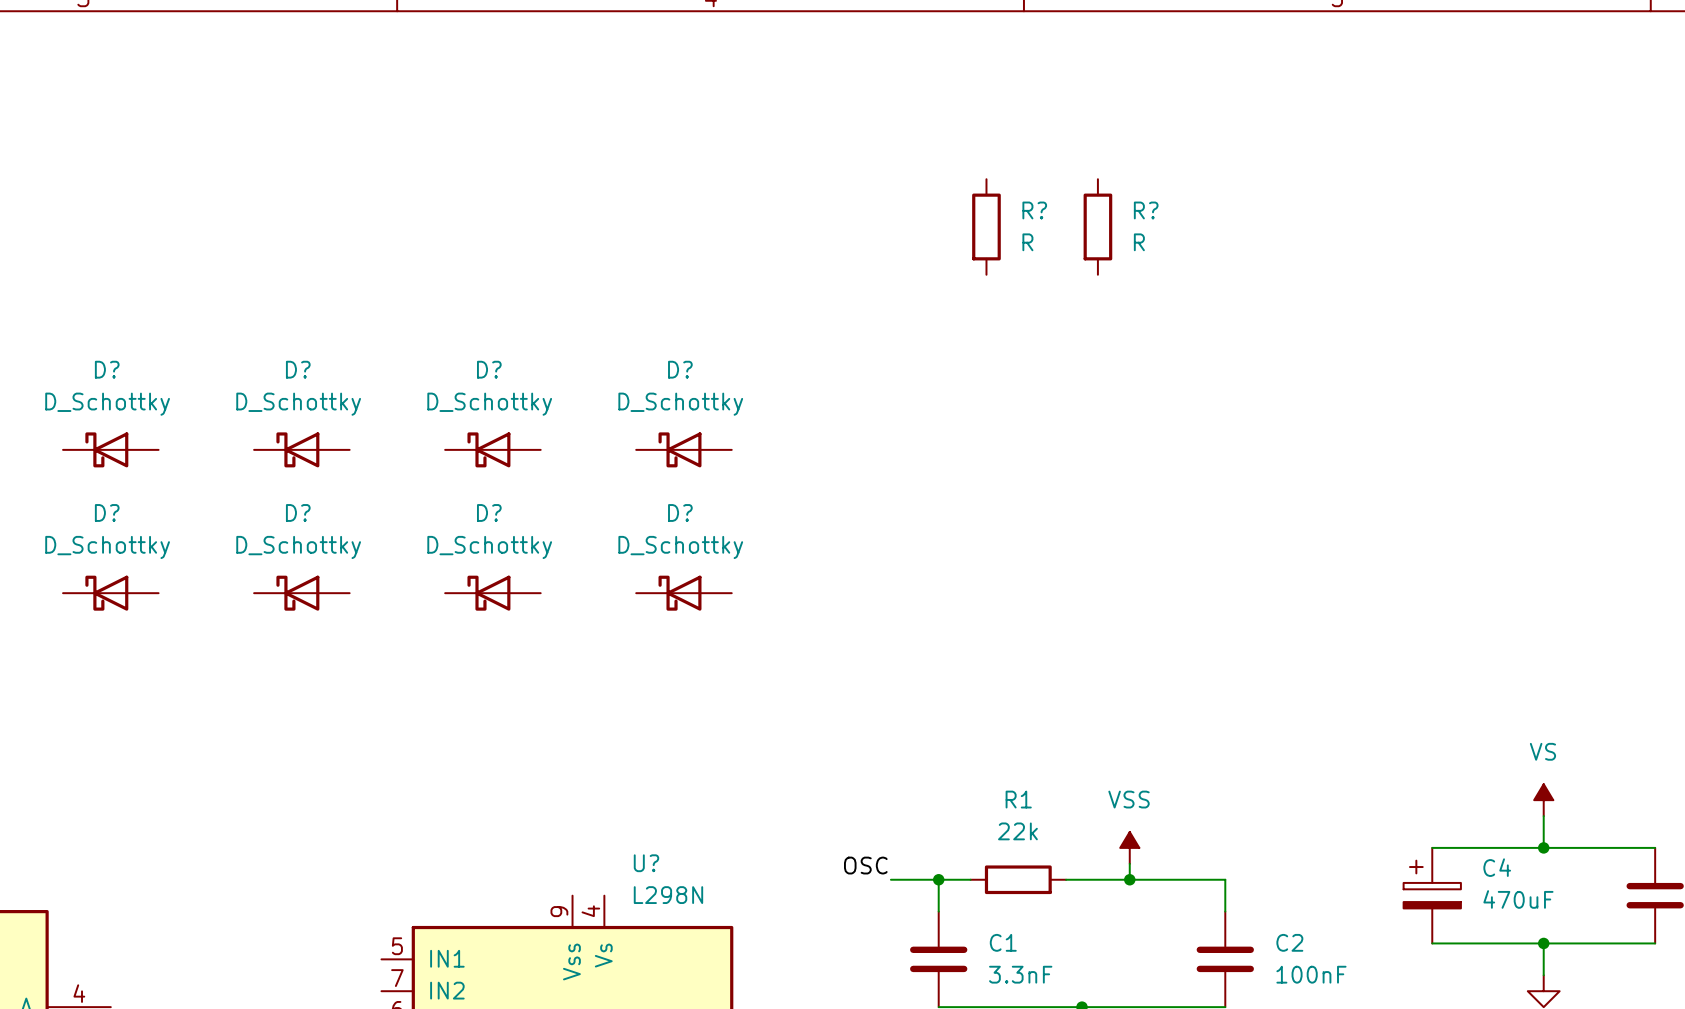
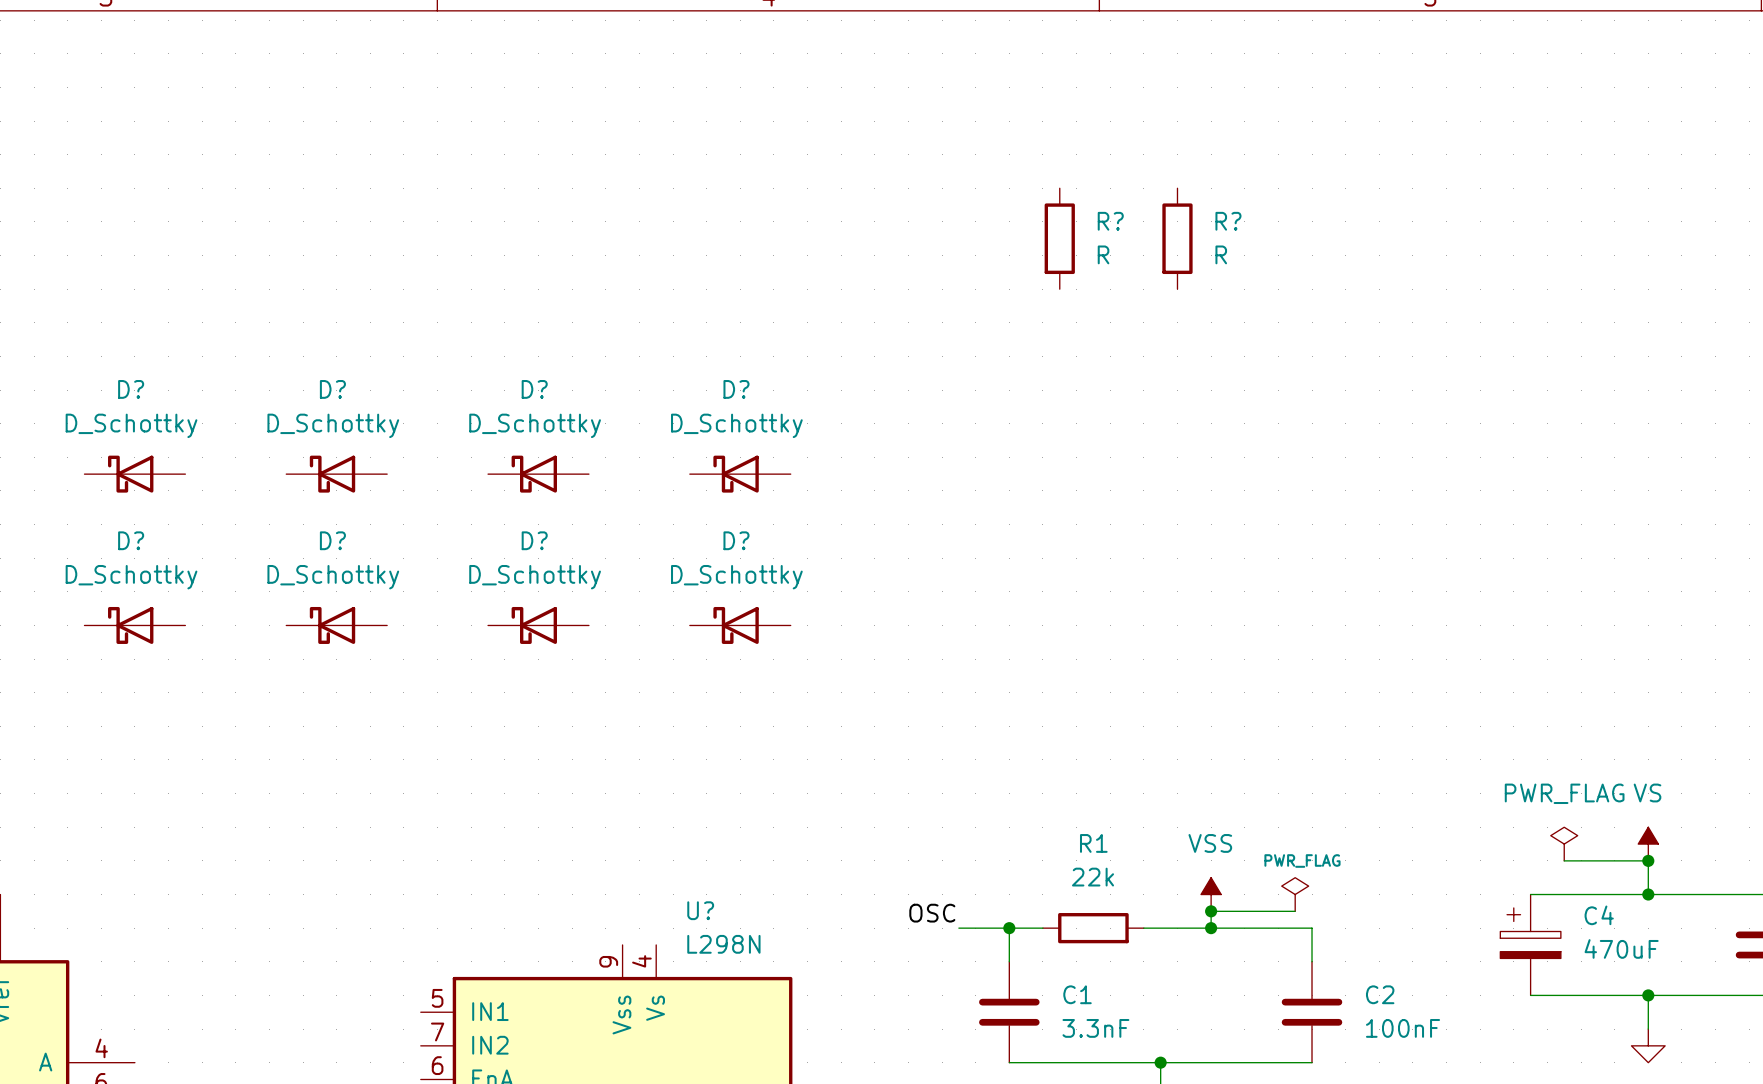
power symbol: none -> PWR_FLAG (1564, 844)
wire: none -> (1564, 860) (1648, 860)
junction: none -> (1648, 860)
power symbol: none -> PWR_FLAG (1295, 894)
wire: none -> (1211, 911) (1295, 911)
junction: none -> (1211, 911)

